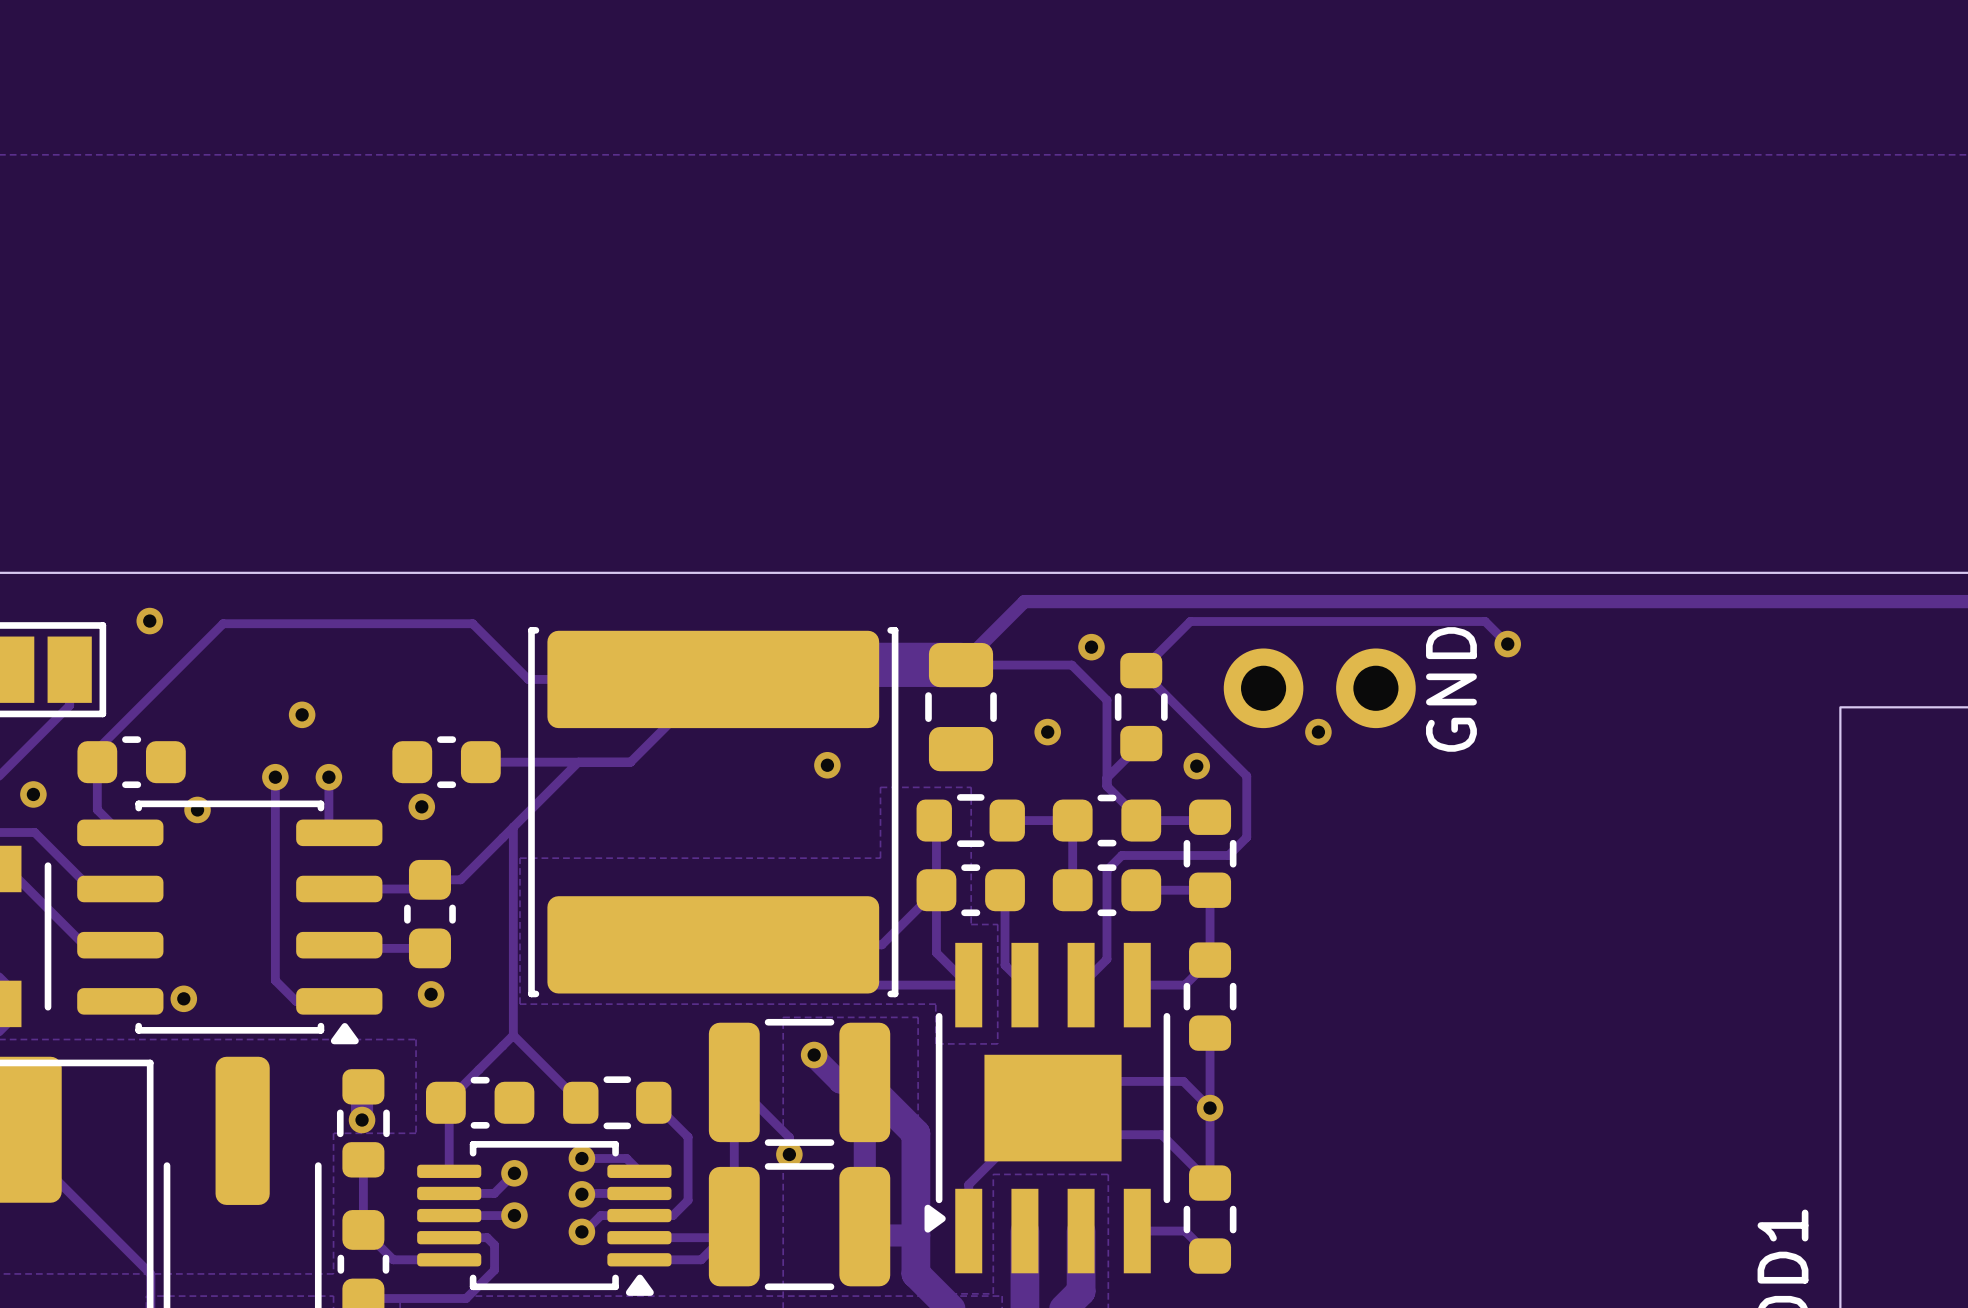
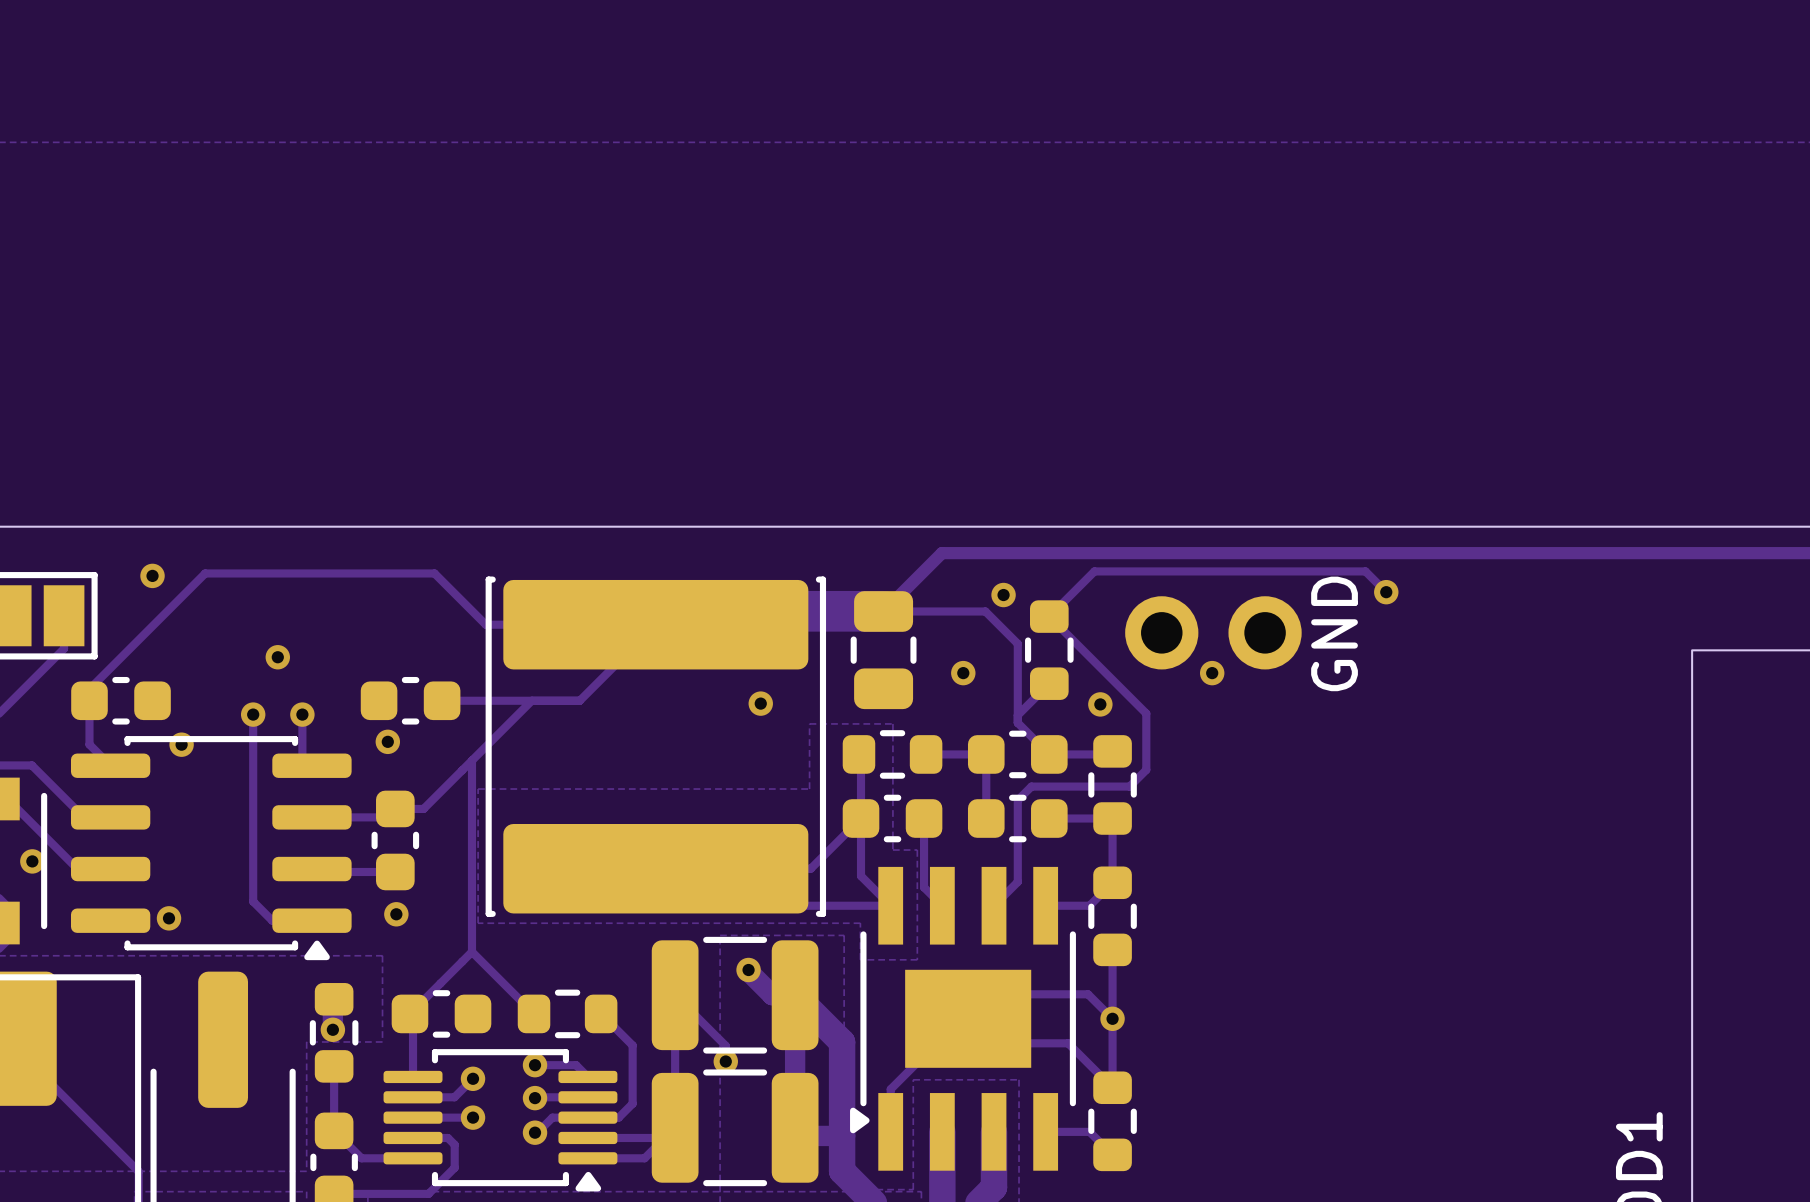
via position: (149, 621) -> (152, 575)
via: (33, 794) -> none
via: none -> (32, 861)

